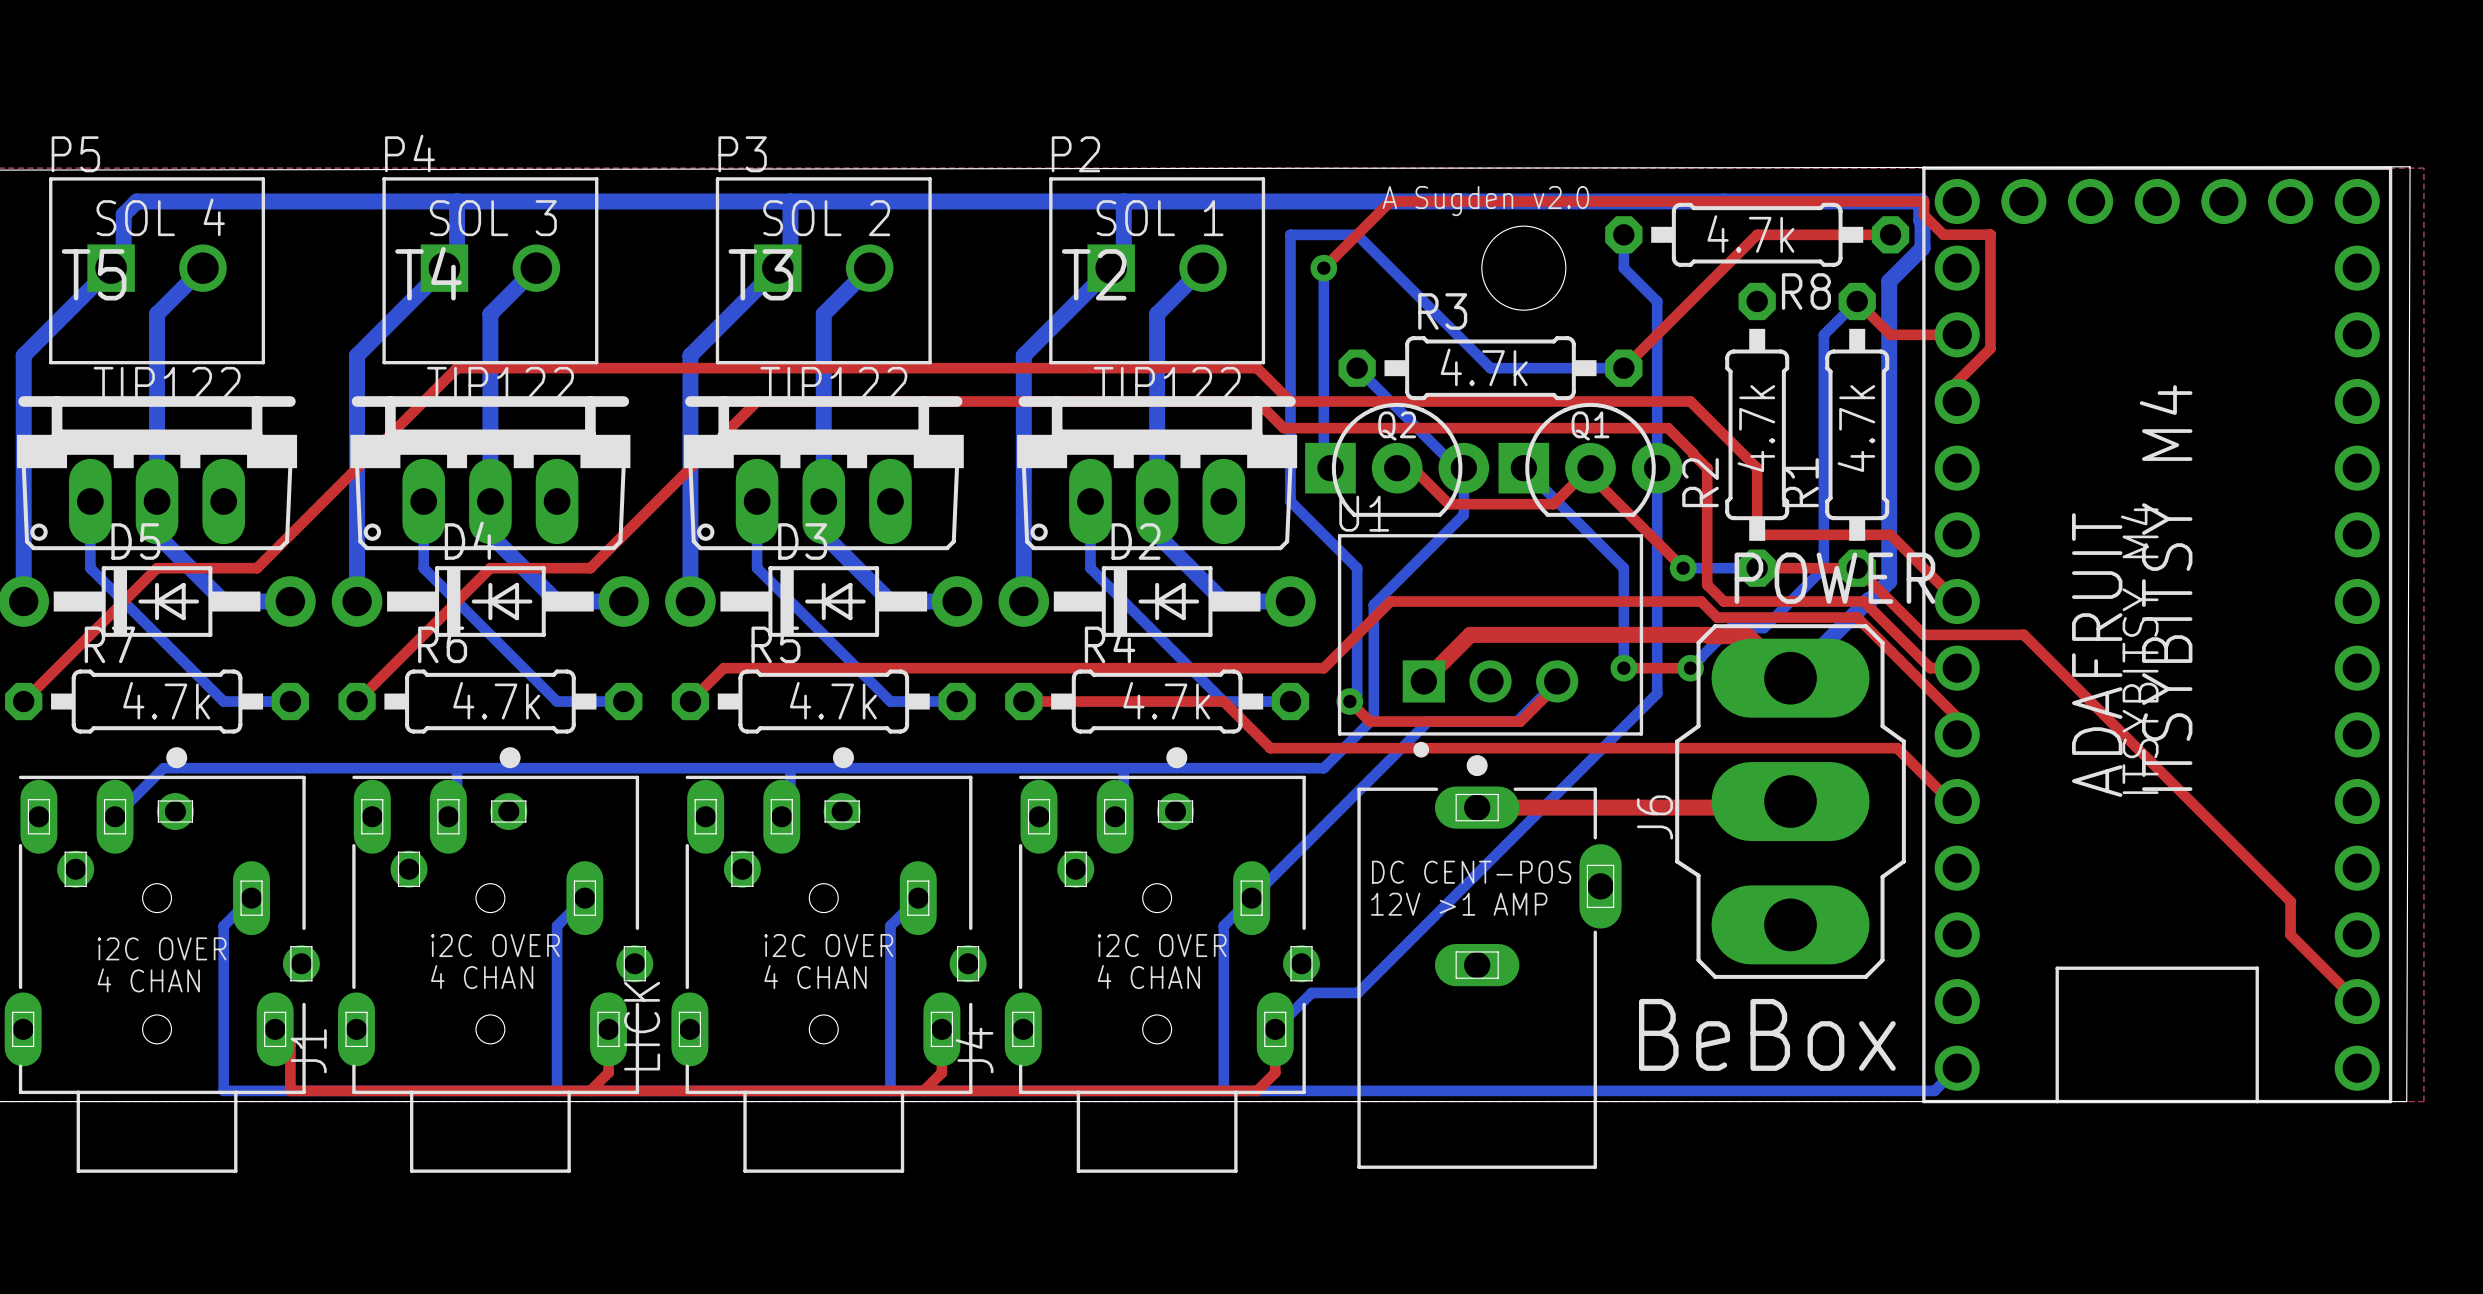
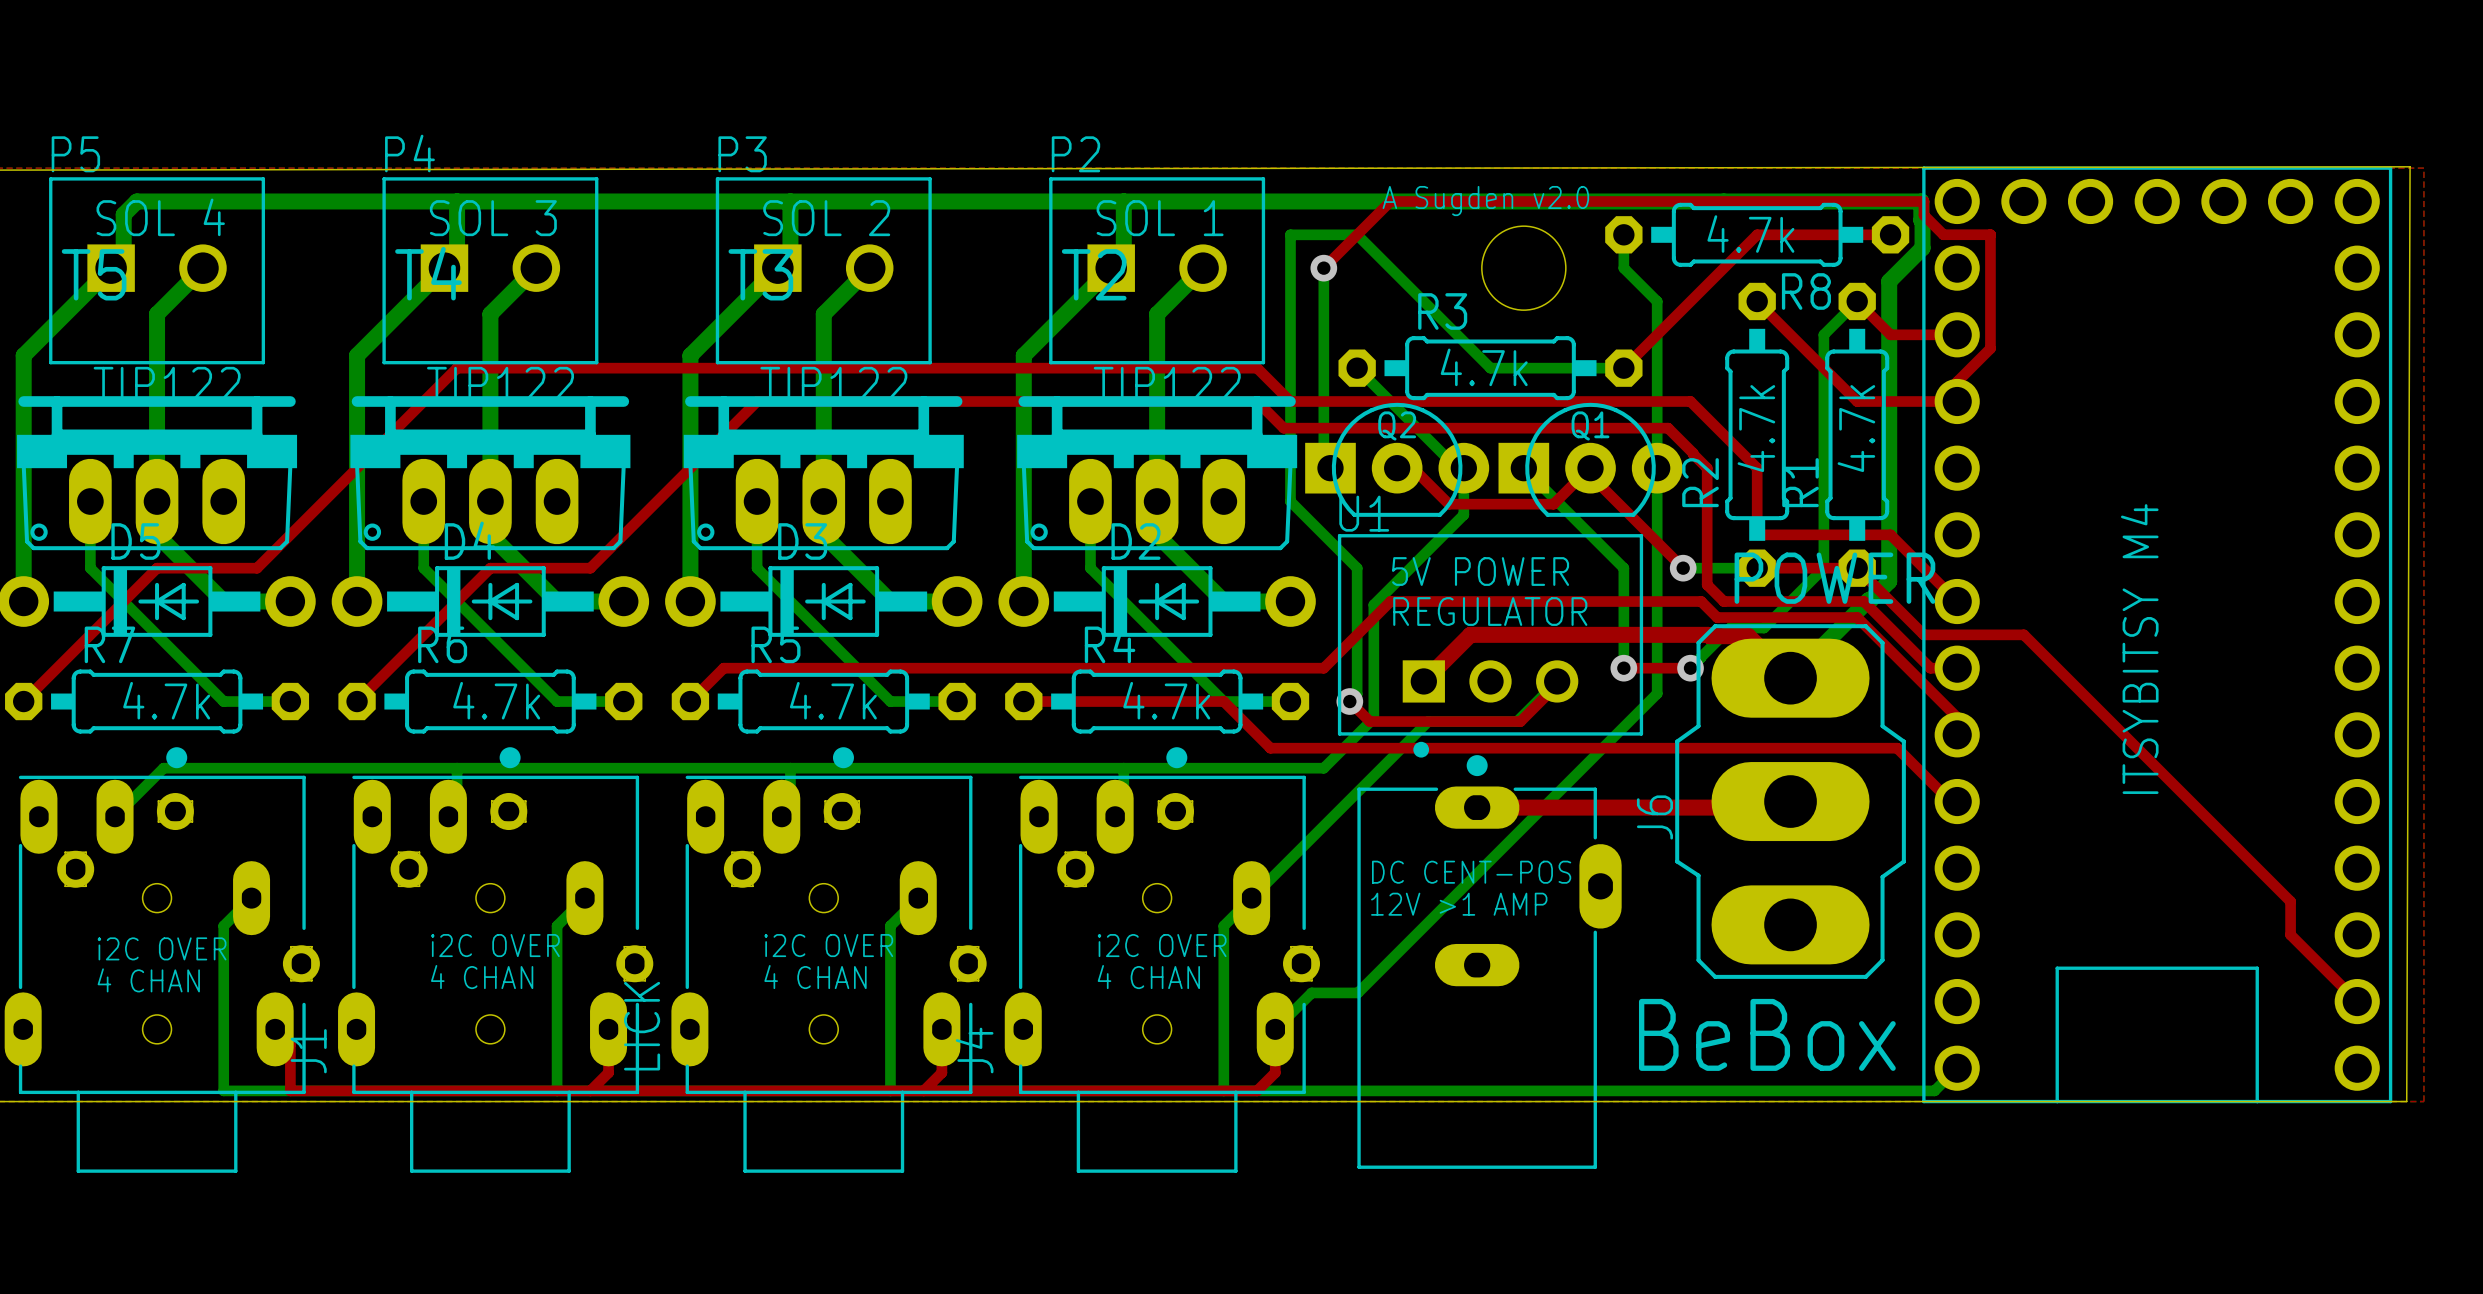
top track: none -> (1757, 301) (1857, 401) (1957, 401)
text: none -> 5V POWER (1480, 571)
text: ITSYBITSY M4 (2166, 588) -> none
text: none -> REGULATOR (1490, 611)
text: ADAFRUIT (2097, 655) -> none

